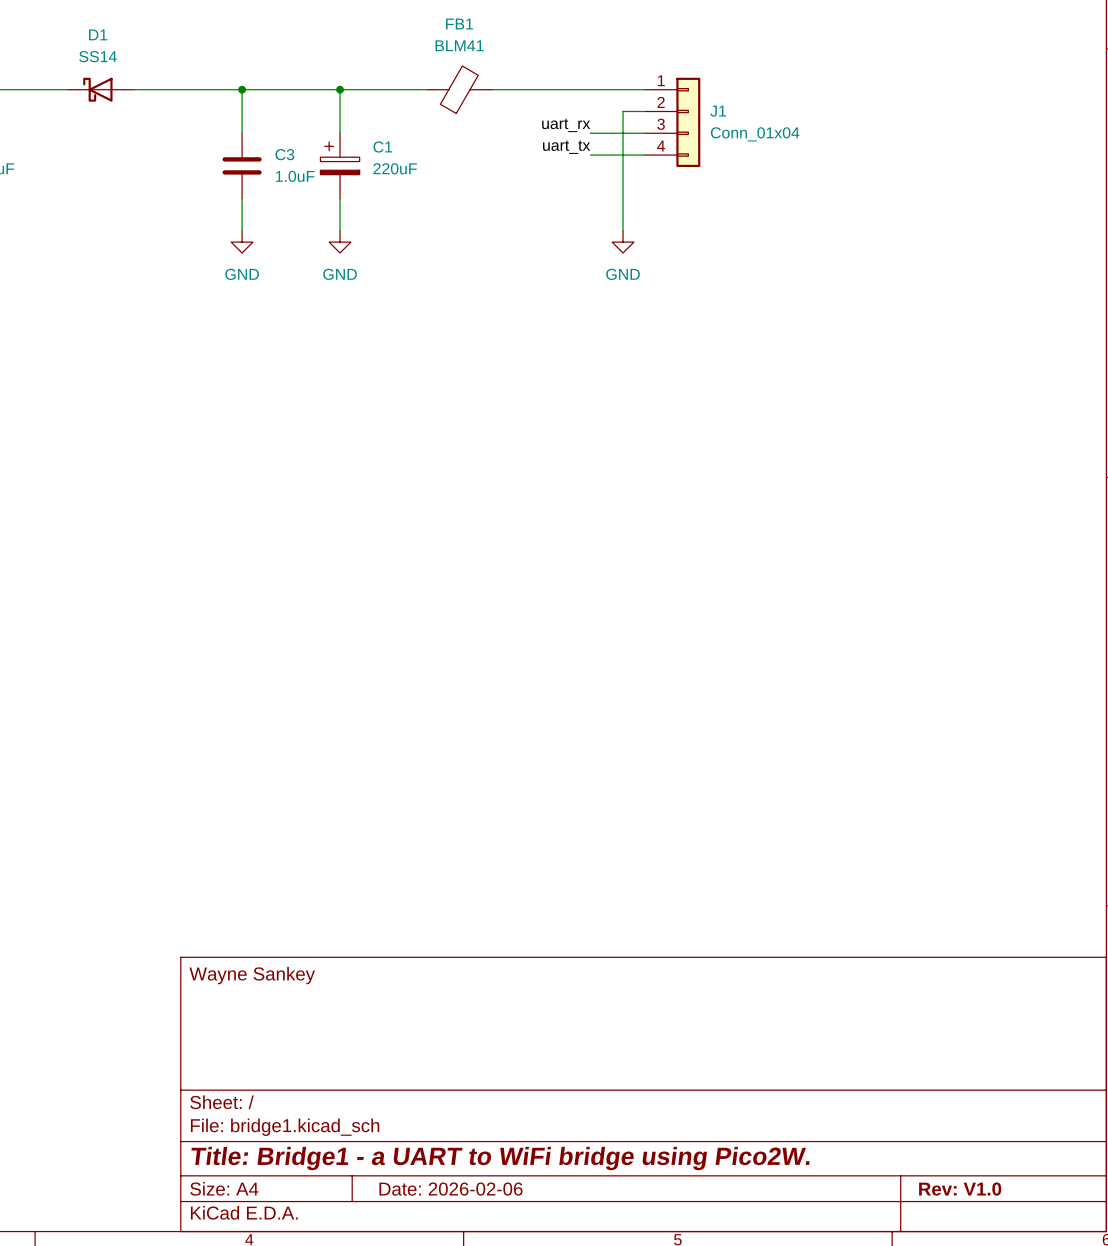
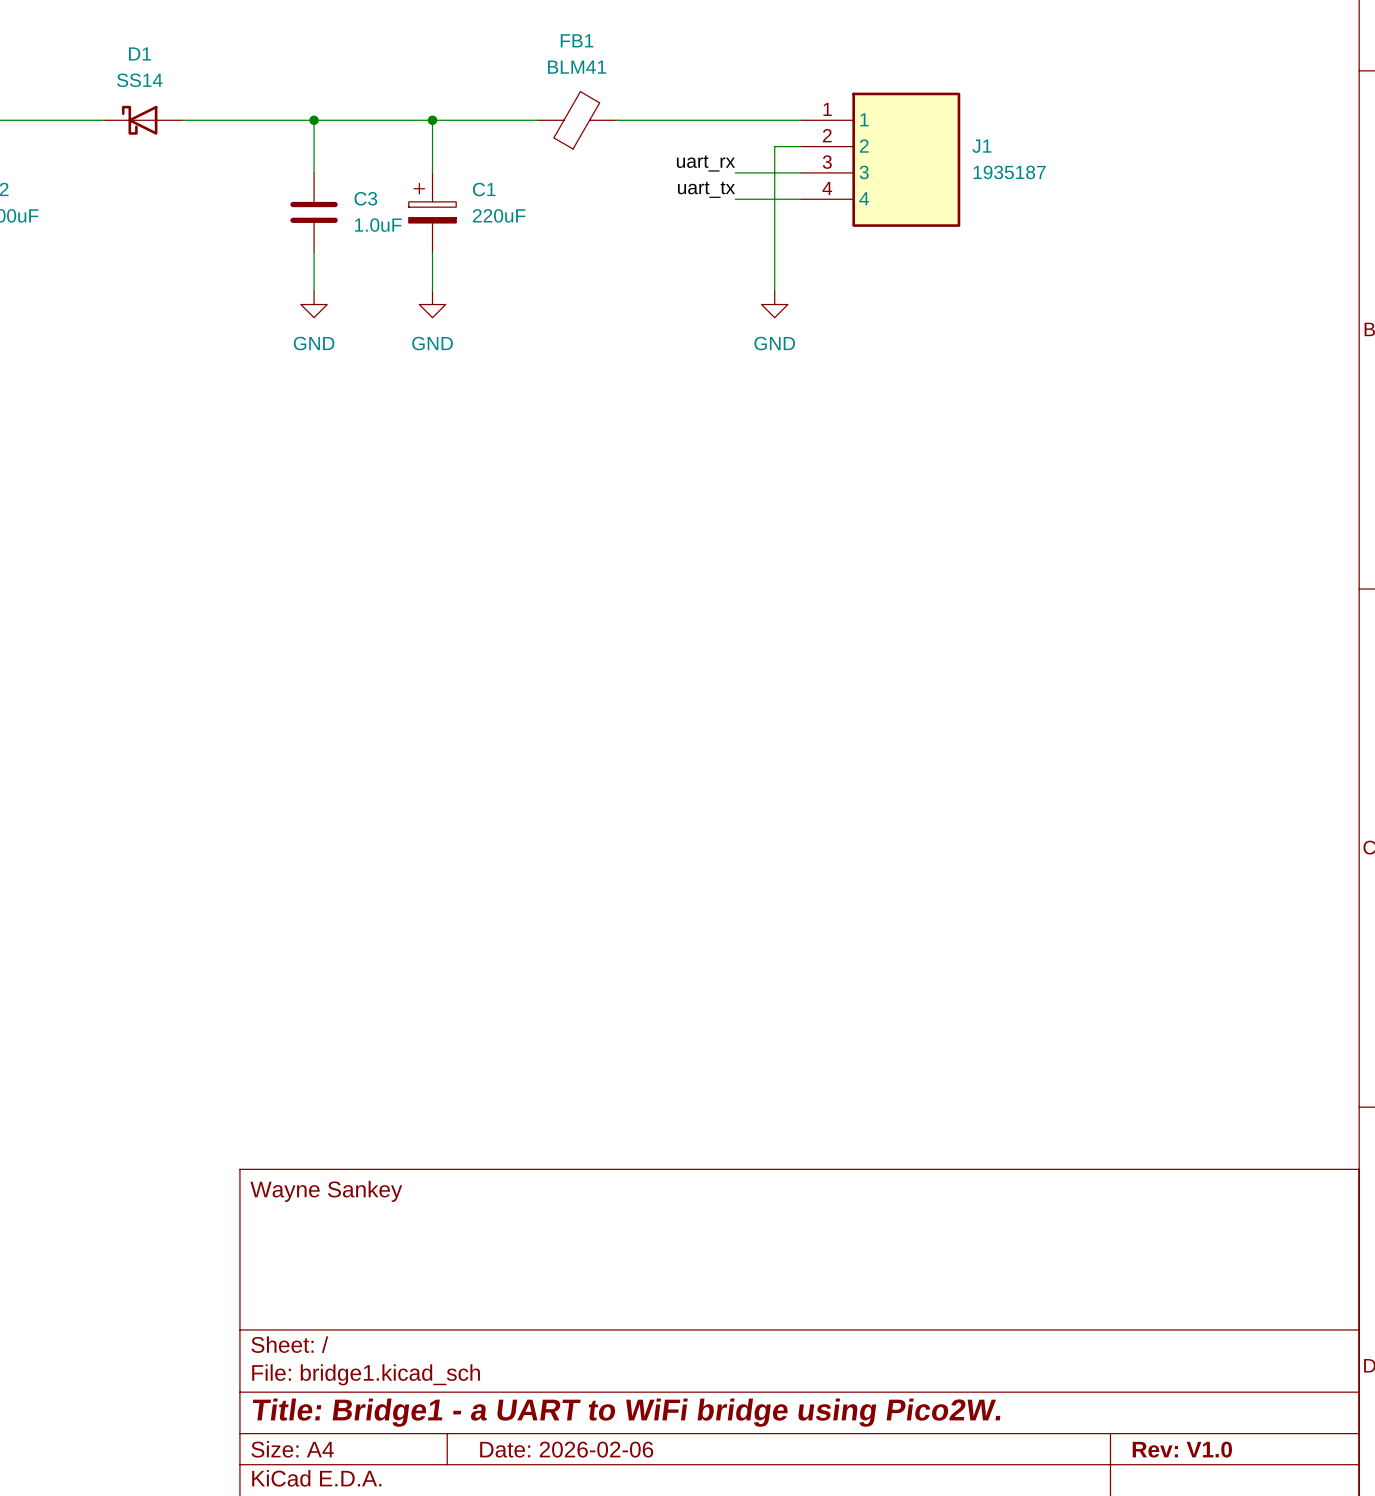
J1 symbol: [644, 77, 701, 168] -> [801, 92, 961, 227]
J1 name position: J1 (718, 111) -> J1 (981, 146)
J1 value: Conn_01x04 (755, 134) -> 1935187 (1009, 172)

